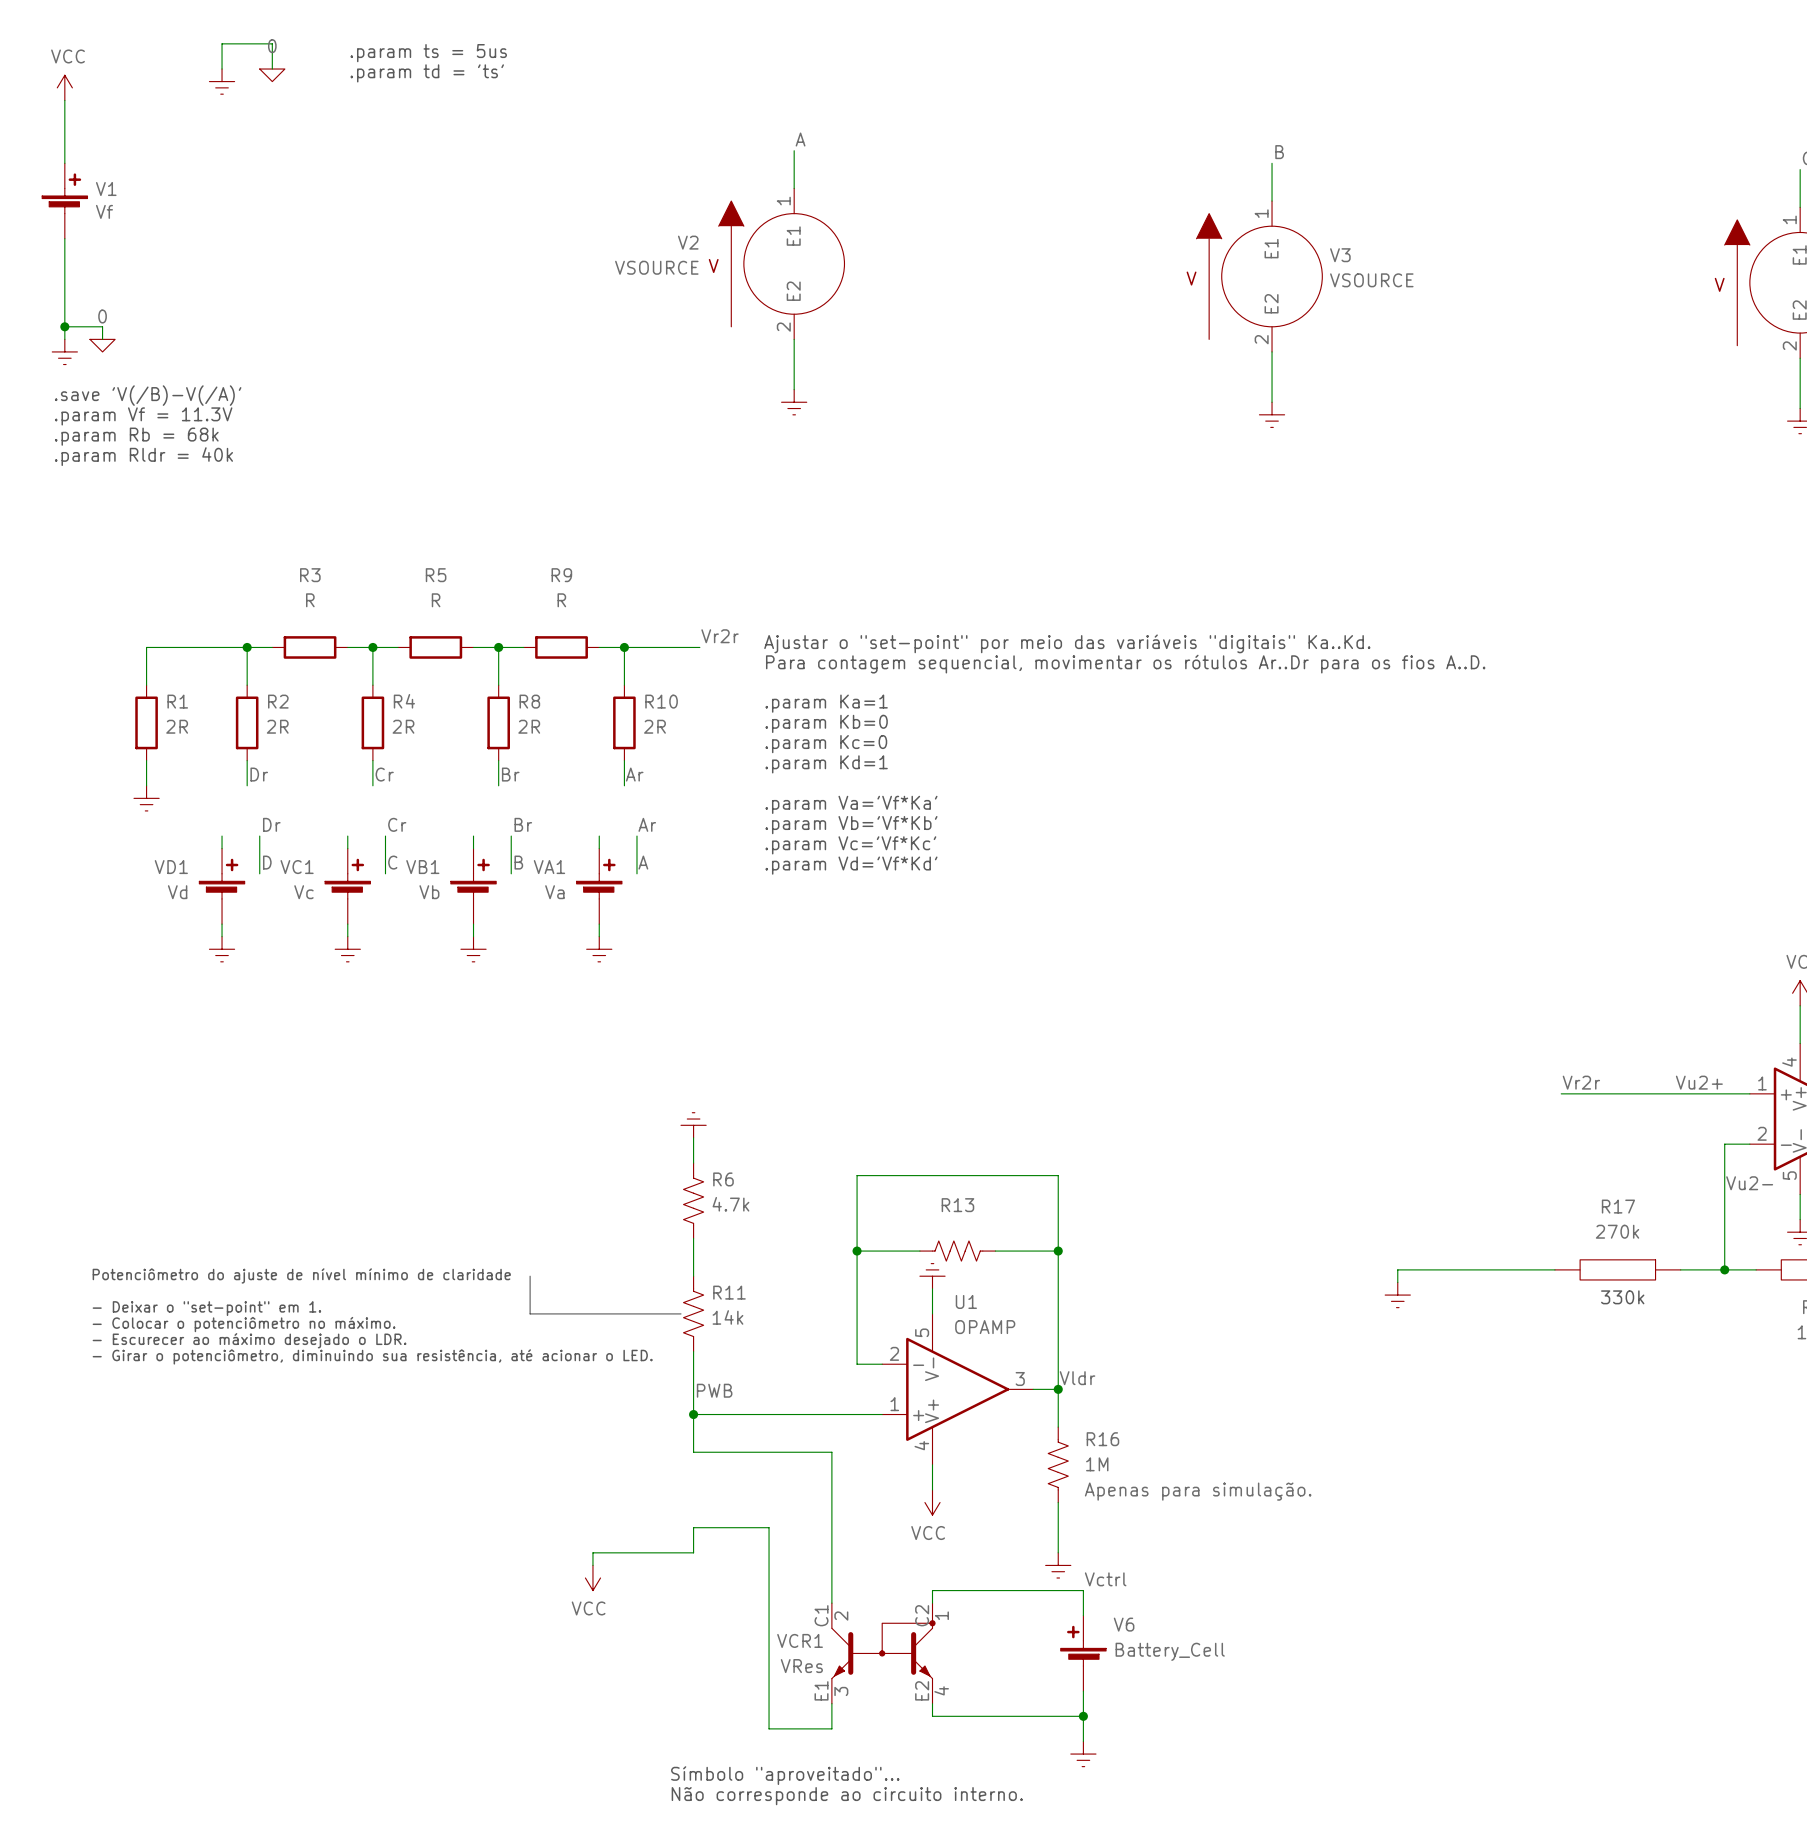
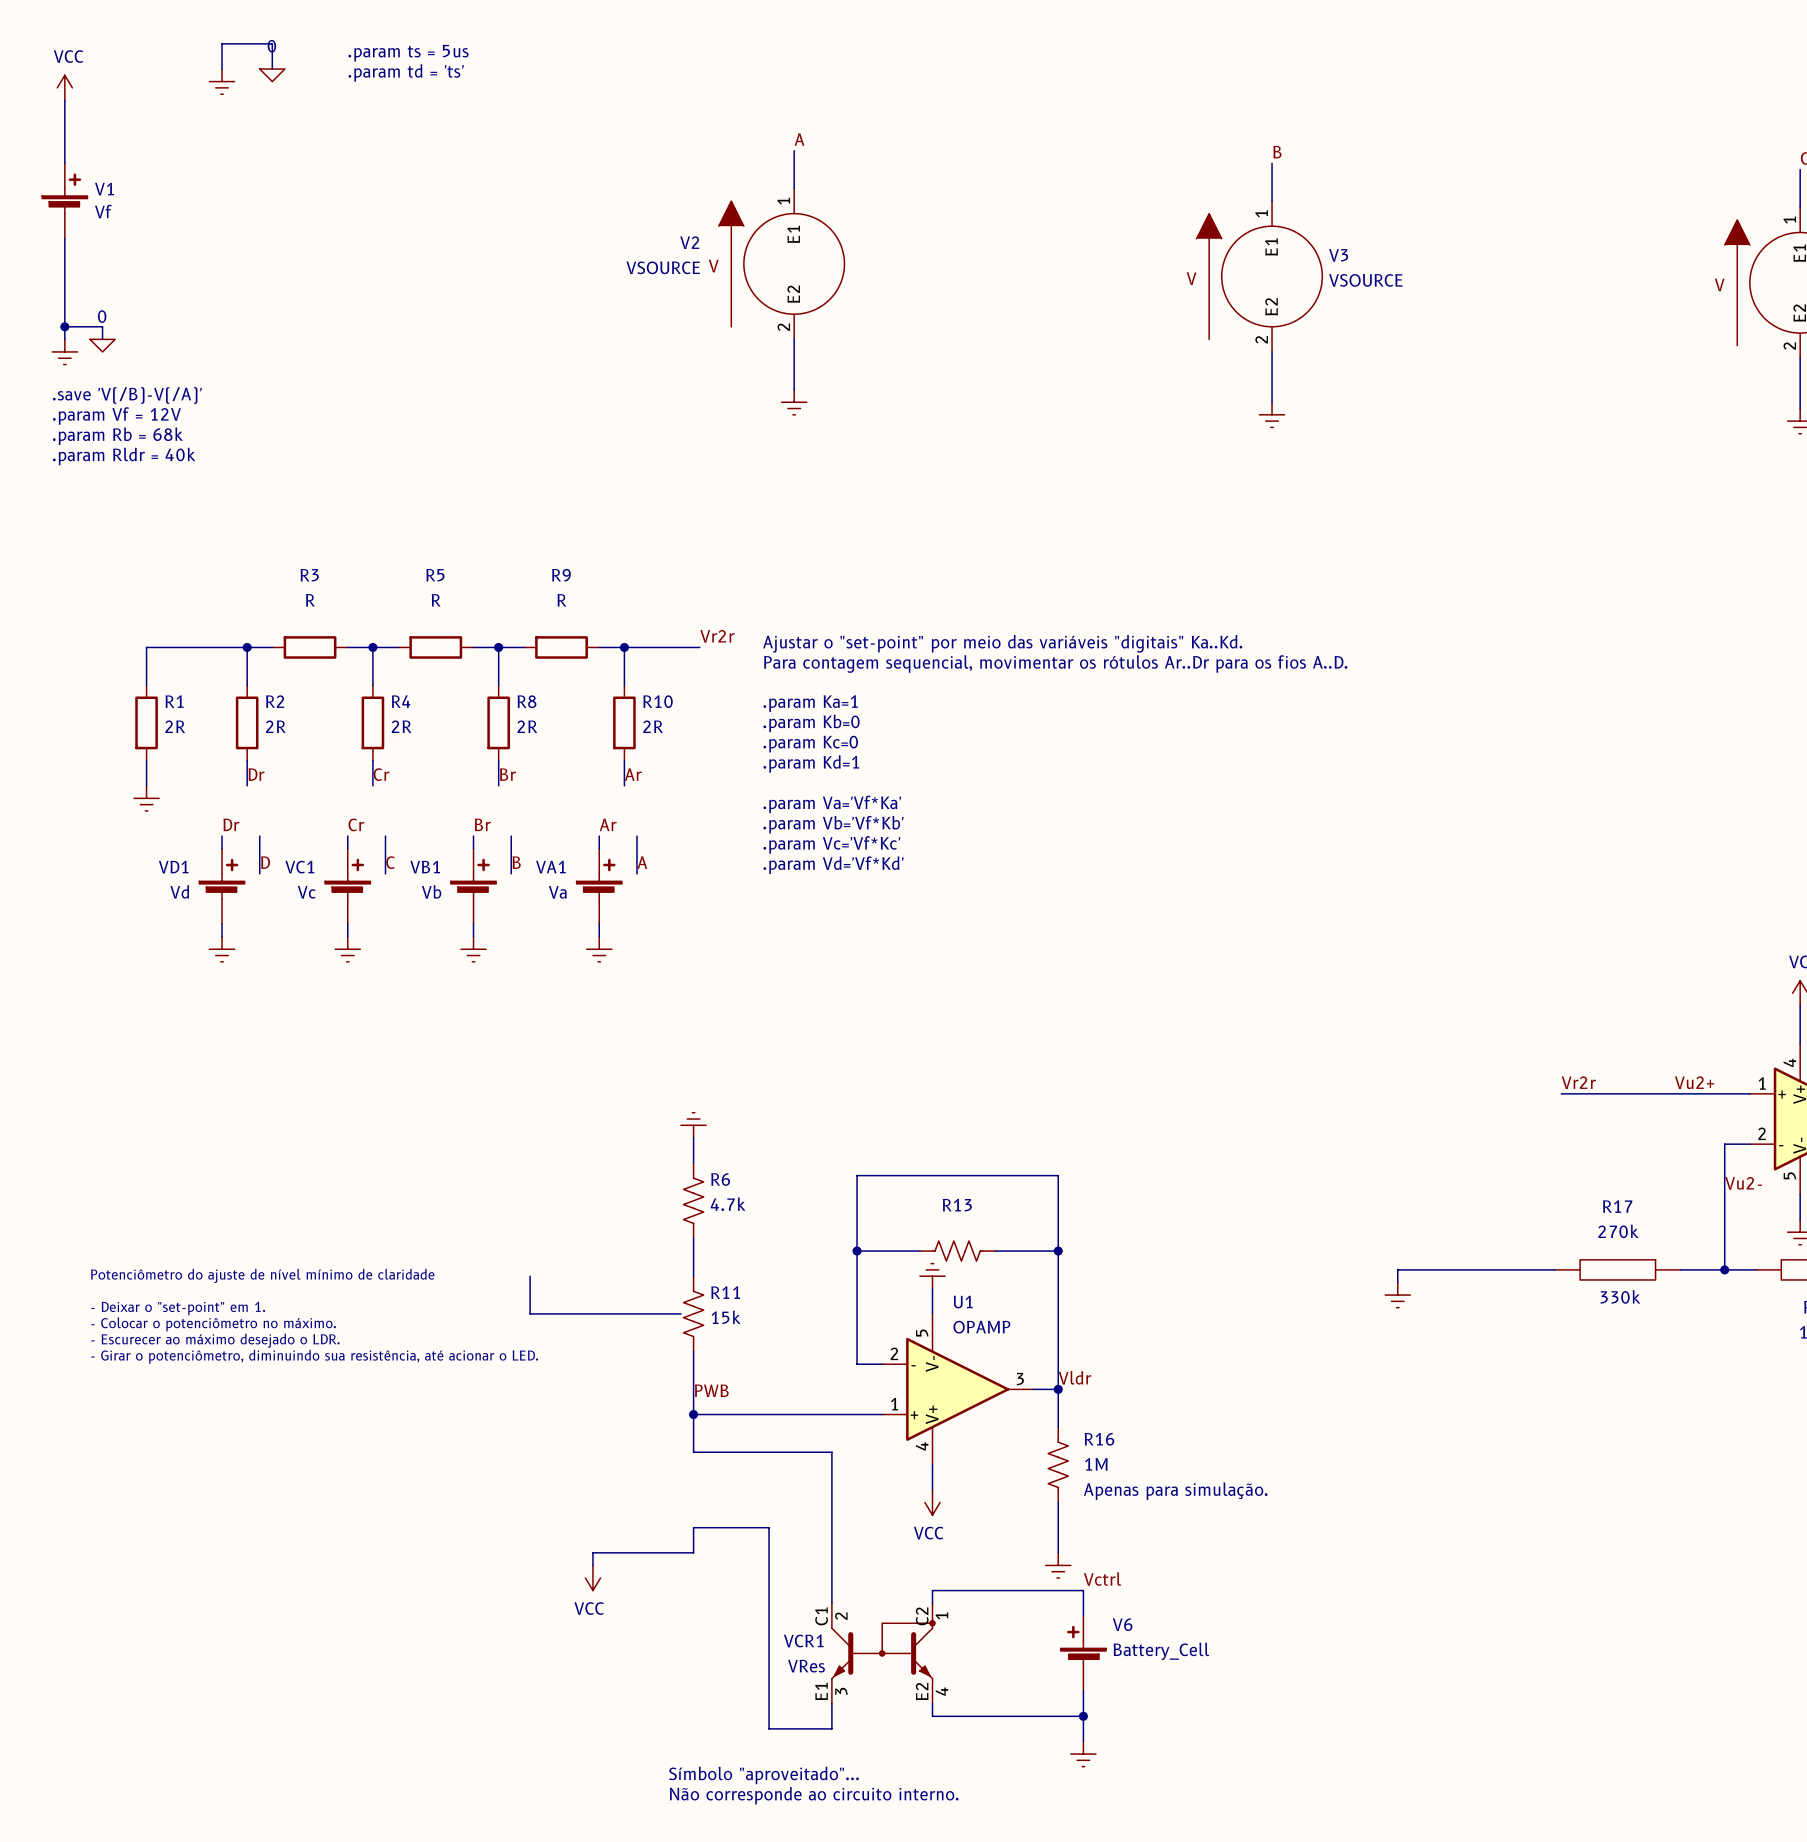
text: .param Vf = 11.3V (143, 416) -> .param Vf = 12V (116, 415)
label position: Dr (271, 824) -> Dr (231, 824)
label position: Cr (397, 824) -> Cr (356, 824)
label position: Br (523, 824) -> Br (482, 824)
label position: Ar (647, 824) -> Ar (608, 824)
R11 value: 14k (727, 1317) -> 15k (726, 1317)

